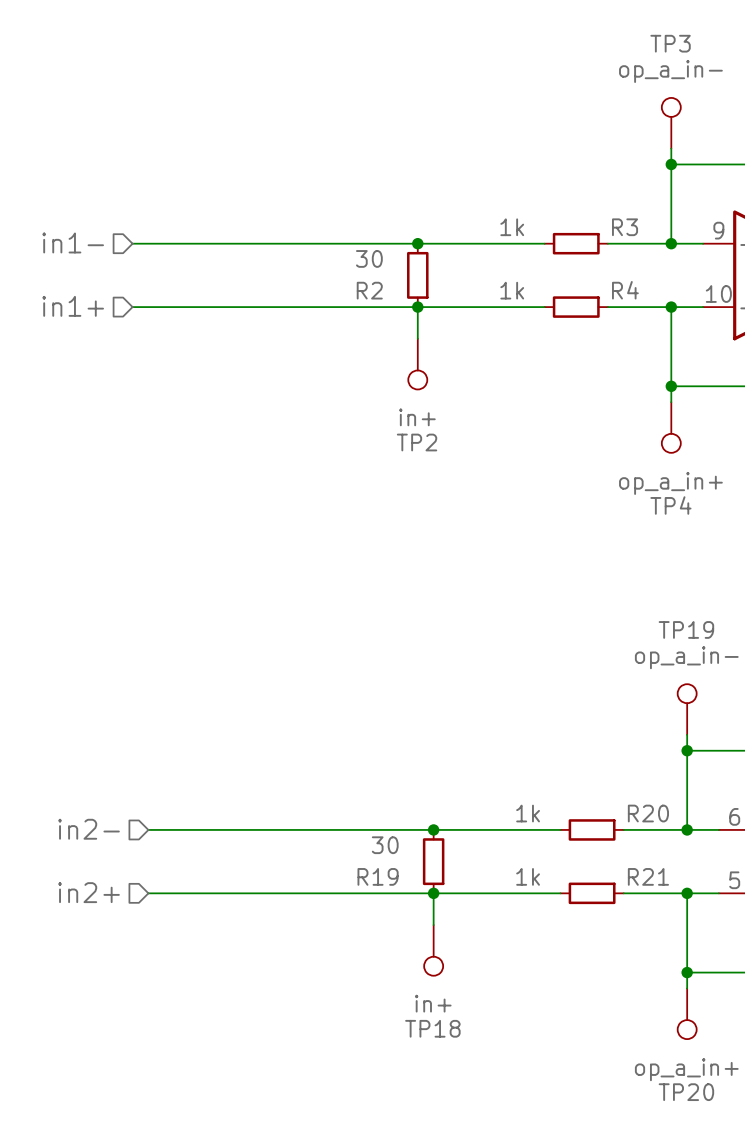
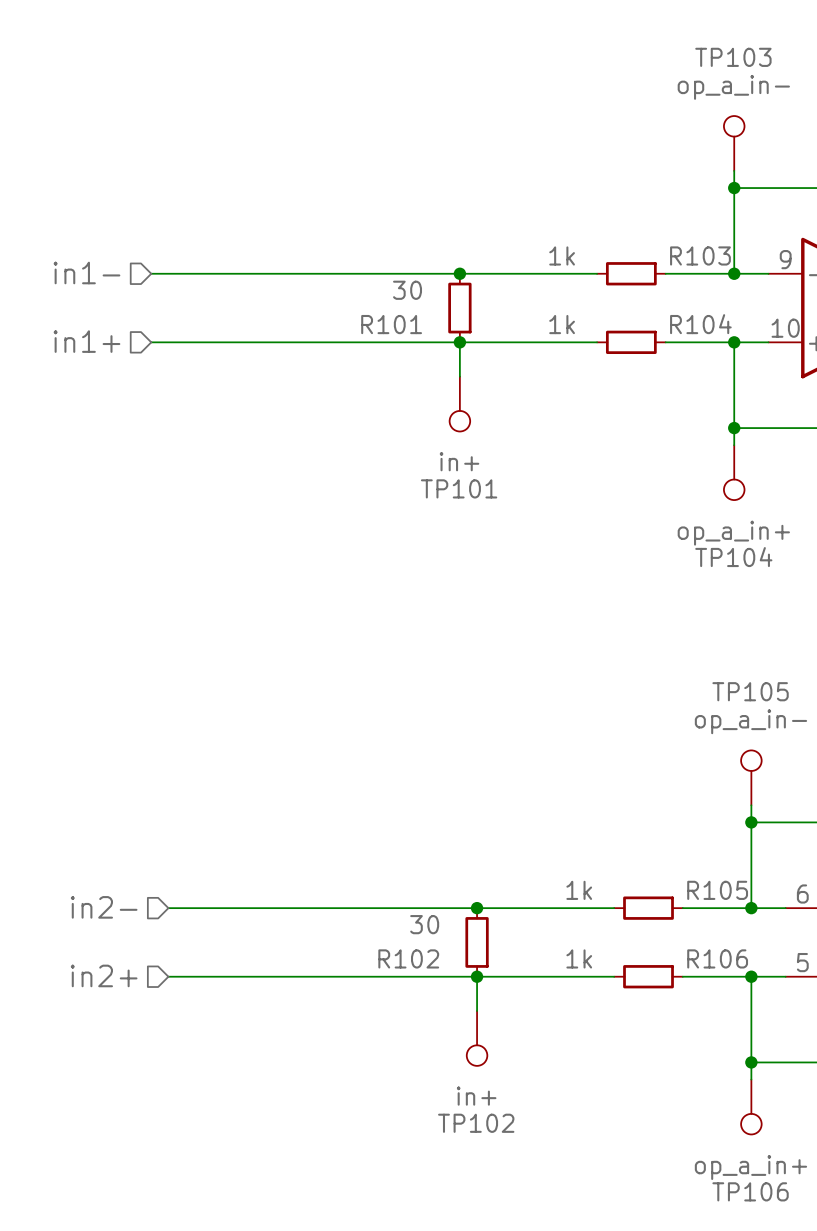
TP3 name: TP3 (670, 43) -> TP103 (733, 57)
R3 name: R3 (625, 227) -> R103 (700, 255)
R2 name: R2 (369, 290) -> R101 (391, 324)
R4 name: R4 (625, 290) -> R104 (700, 324)
TP2 name: TP2 (417, 442) -> TP101 (459, 488)
TP4 name: TP4 (670, 505) -> TP104 (733, 557)
TP19 name: TP19 (686, 629) -> TP105 (750, 691)
R20 name: R20 (648, 813) -> R105 (717, 890)
R19 name: R19 (378, 876) -> R102 (408, 958)
R21 name: R21 (648, 876) -> R106 (717, 958)
TP18 name: TP18 (432, 1028) -> TP102 (476, 1123)
TP20 name: TP20 (686, 1092) -> TP106 (750, 1191)

